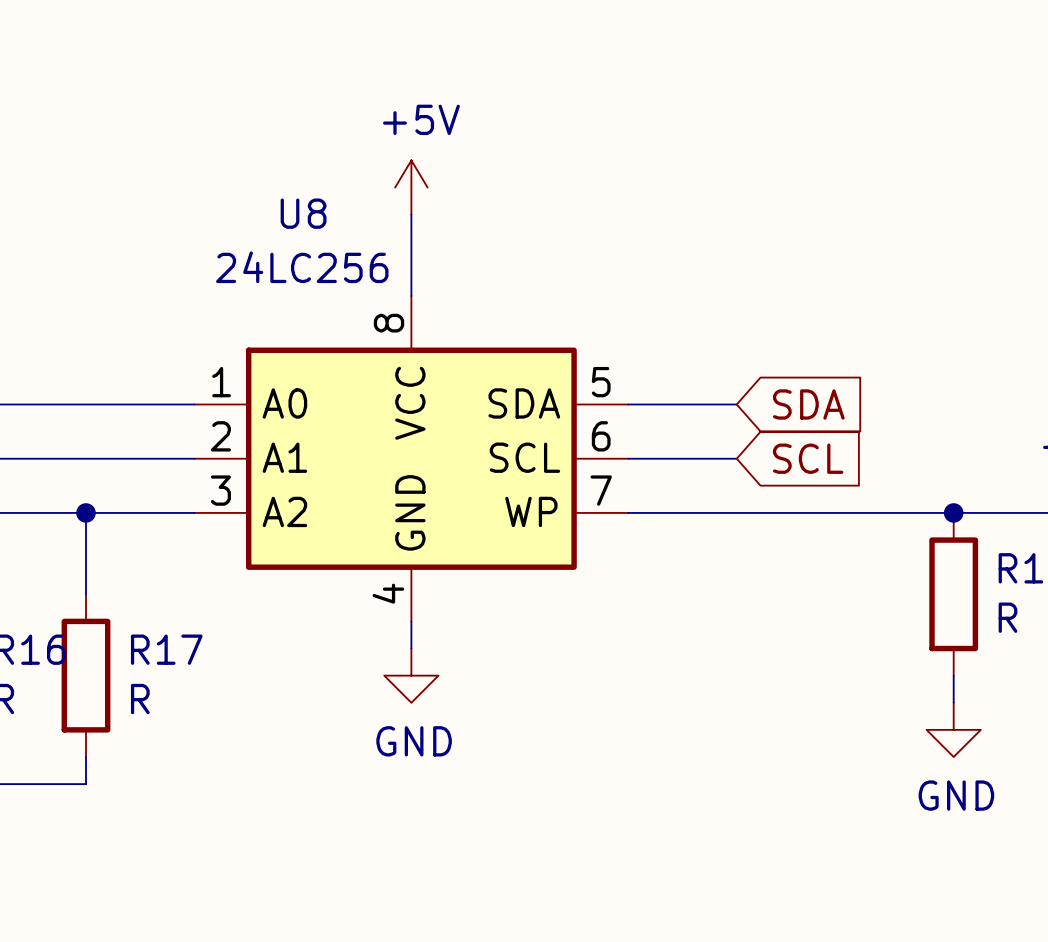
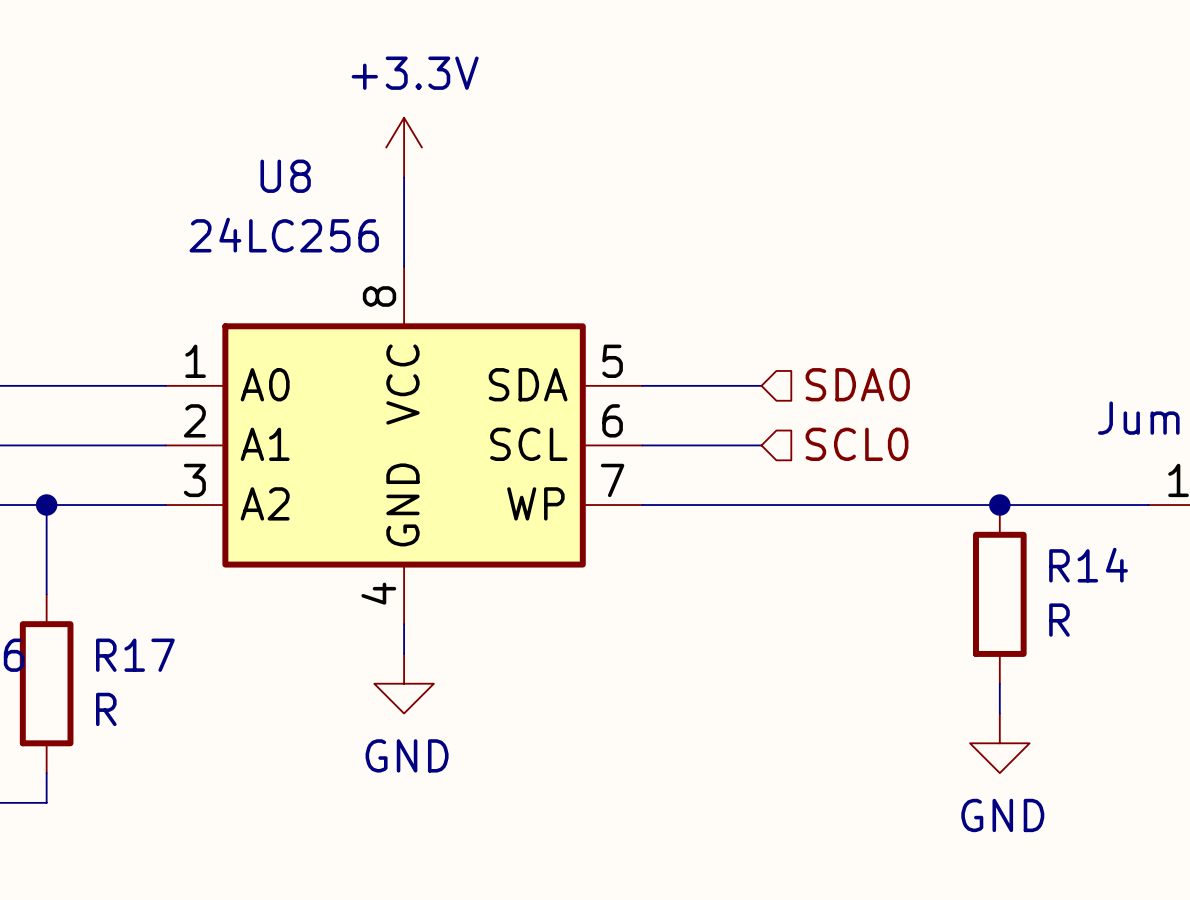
power symbol: +5V (411, 187) -> +3.3V (404, 147)
hierarchical label: none -> SDA0 (857, 384)
global label: SDA (808, 404) -> none
hierarchical label: none -> SCL0 (857, 444)
global label: SCL (808, 458) -> none

